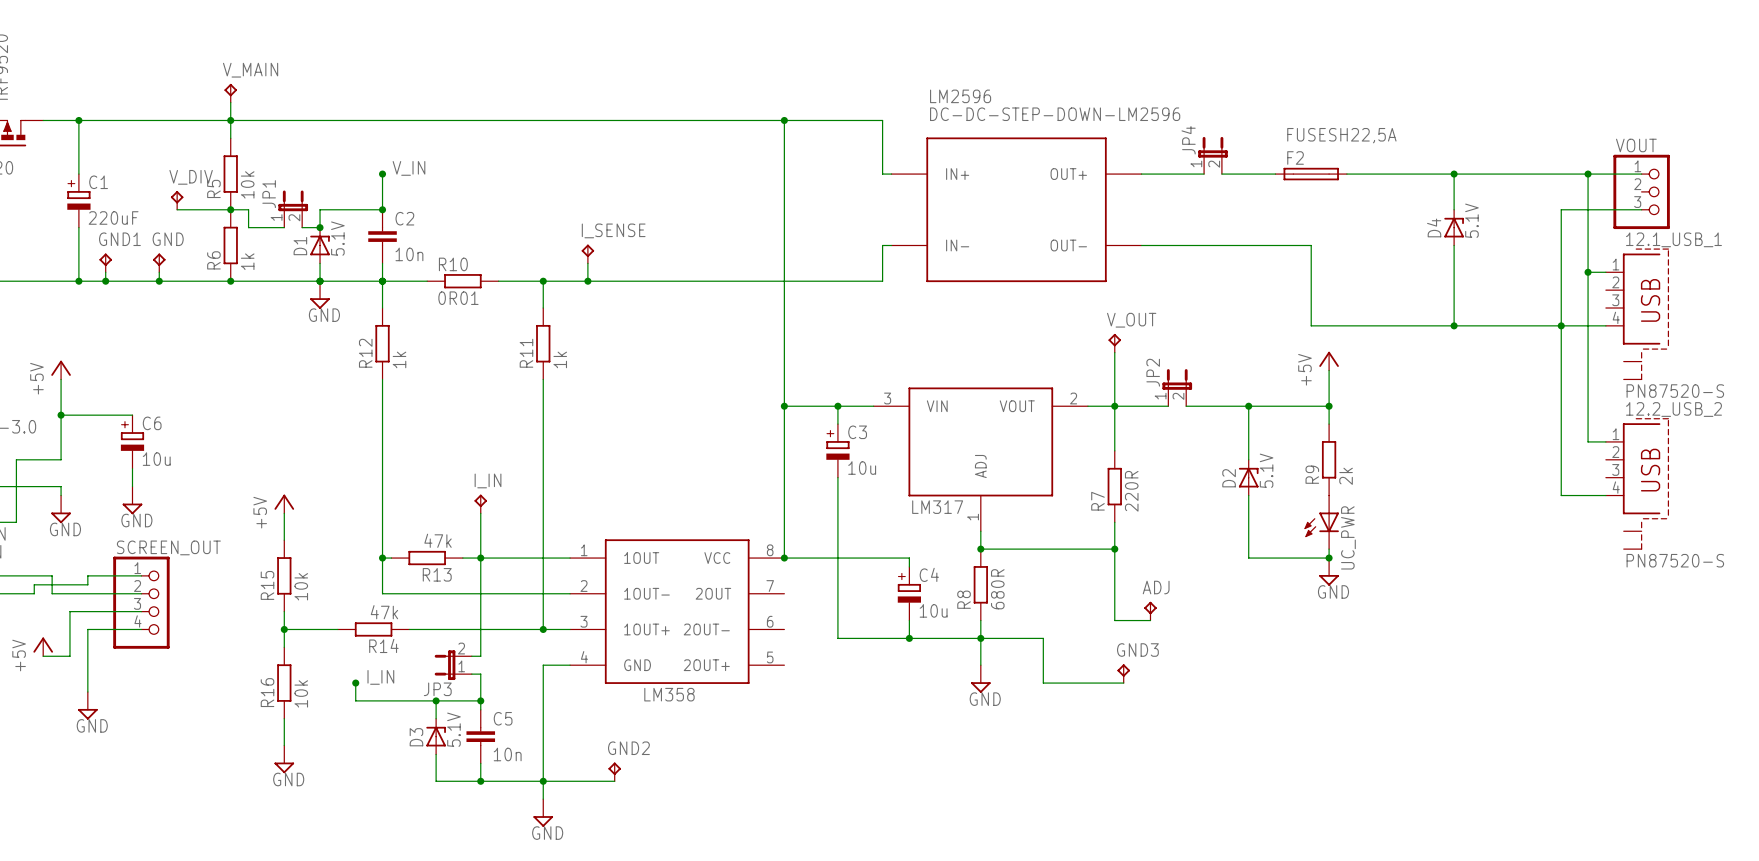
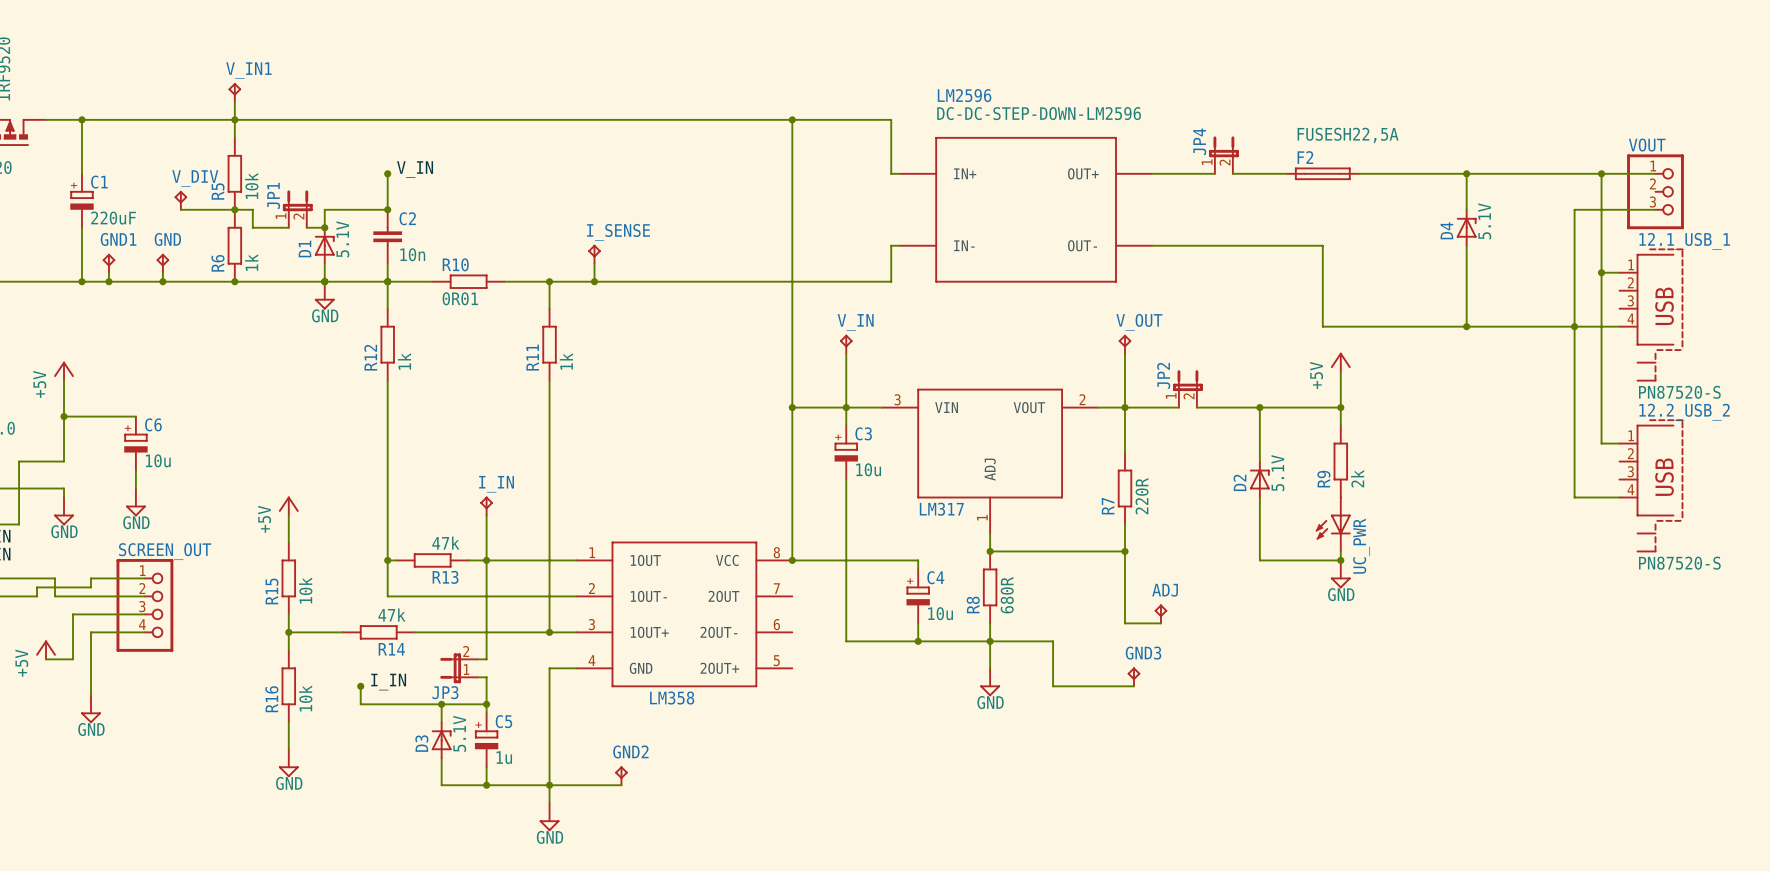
V_MAIN name: V_MAIN (250, 70) -> V_IN1 (248, 70)
V_IN: none -> (846, 344)
wire: none -> (846, 353) (846, 407)
C5 symbol: [466, 709, 496, 764] -> [474, 713, 499, 768]
C5 value: 10n (507, 754) -> 1u (504, 757)

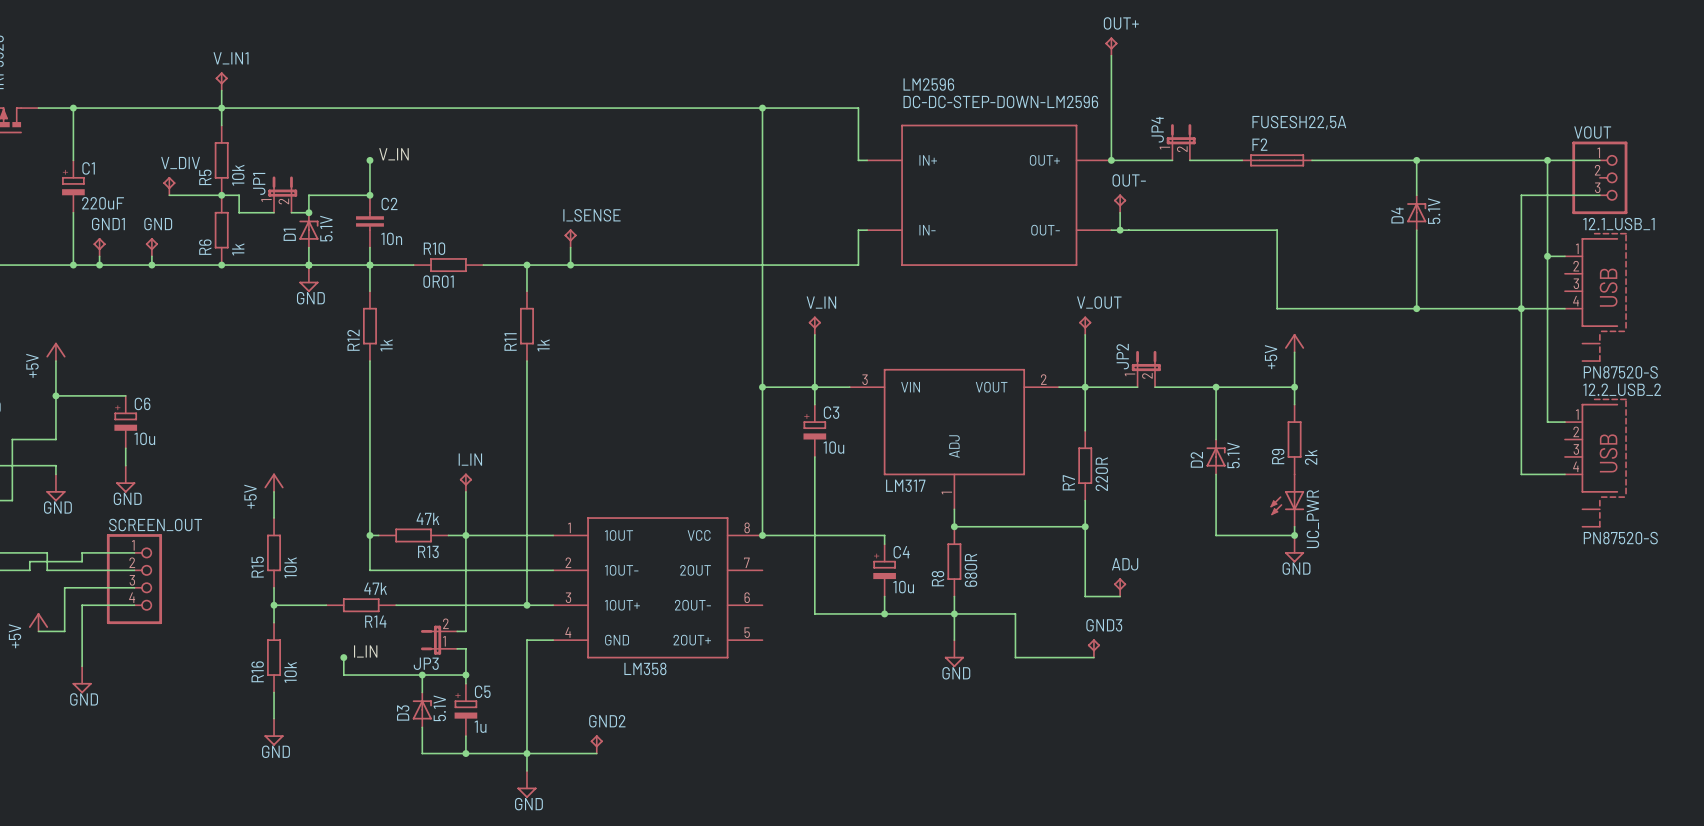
OUT+: none -> (1111, 46)
wire: none -> (1111, 55) (1111, 160)
junction: none -> (1111, 160)
OUT-: none -> (1120, 203)
wire: none -> (1120, 212) (1120, 230)
junction: none -> (1120, 230)

